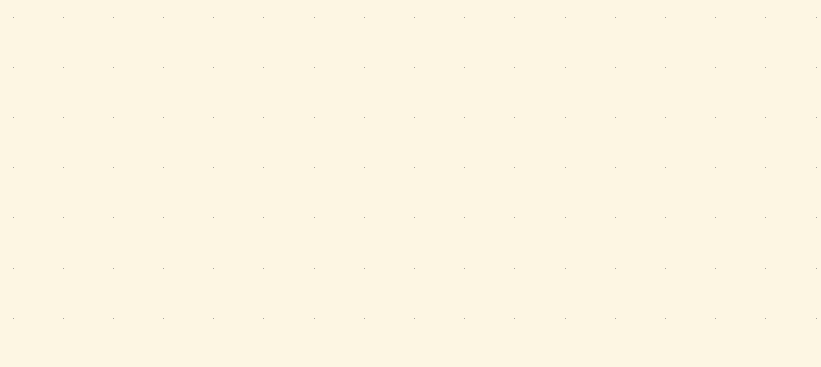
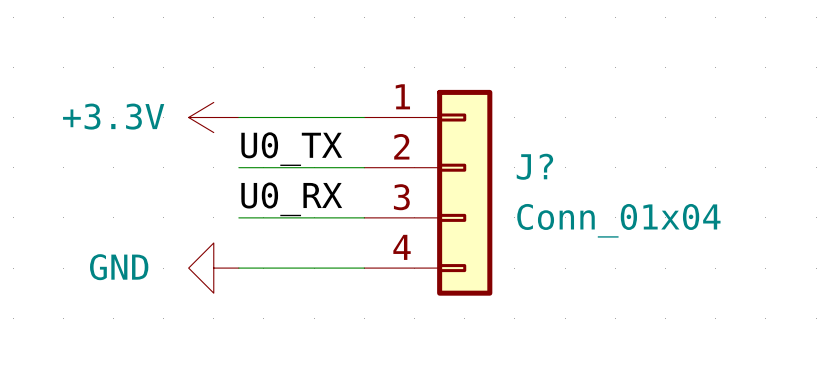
power symbol: none -> +3.3V (213, 117)
wire: none -> (238, 117) (364, 117)
label: none -> U0_TX (291, 149)
wire: none -> (238, 167) (364, 167)
J?: none -> Conn_01x04 (428, 192)
label: none -> U0_RX (291, 199)
wire: none -> (238, 217) (364, 217)
power symbol: none -> GND (213, 268)
wire: none -> (238, 268) (364, 268)

